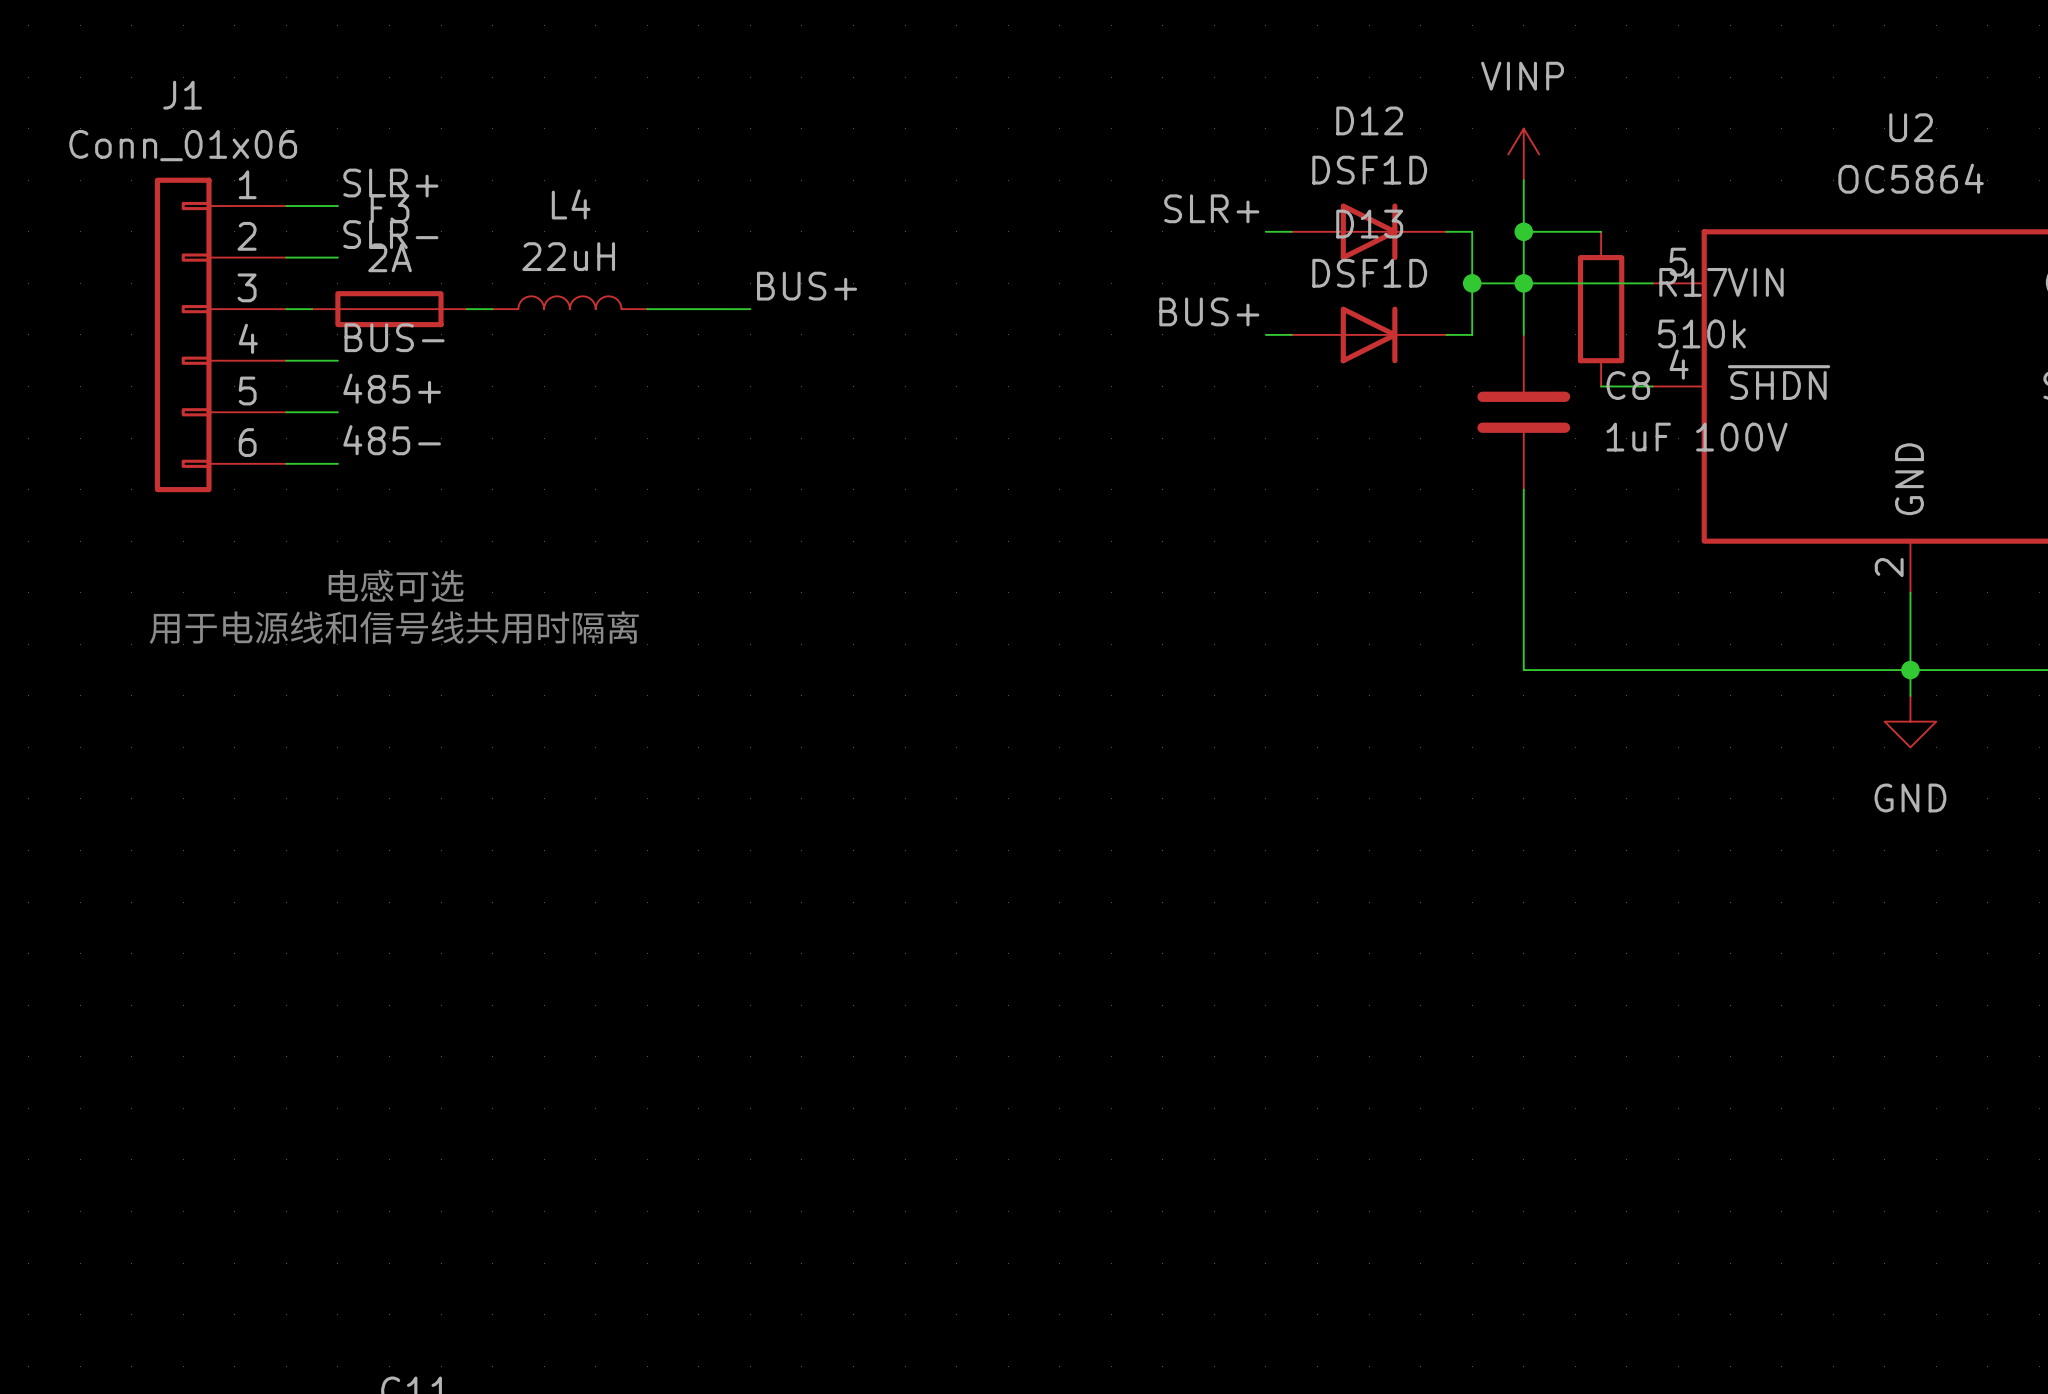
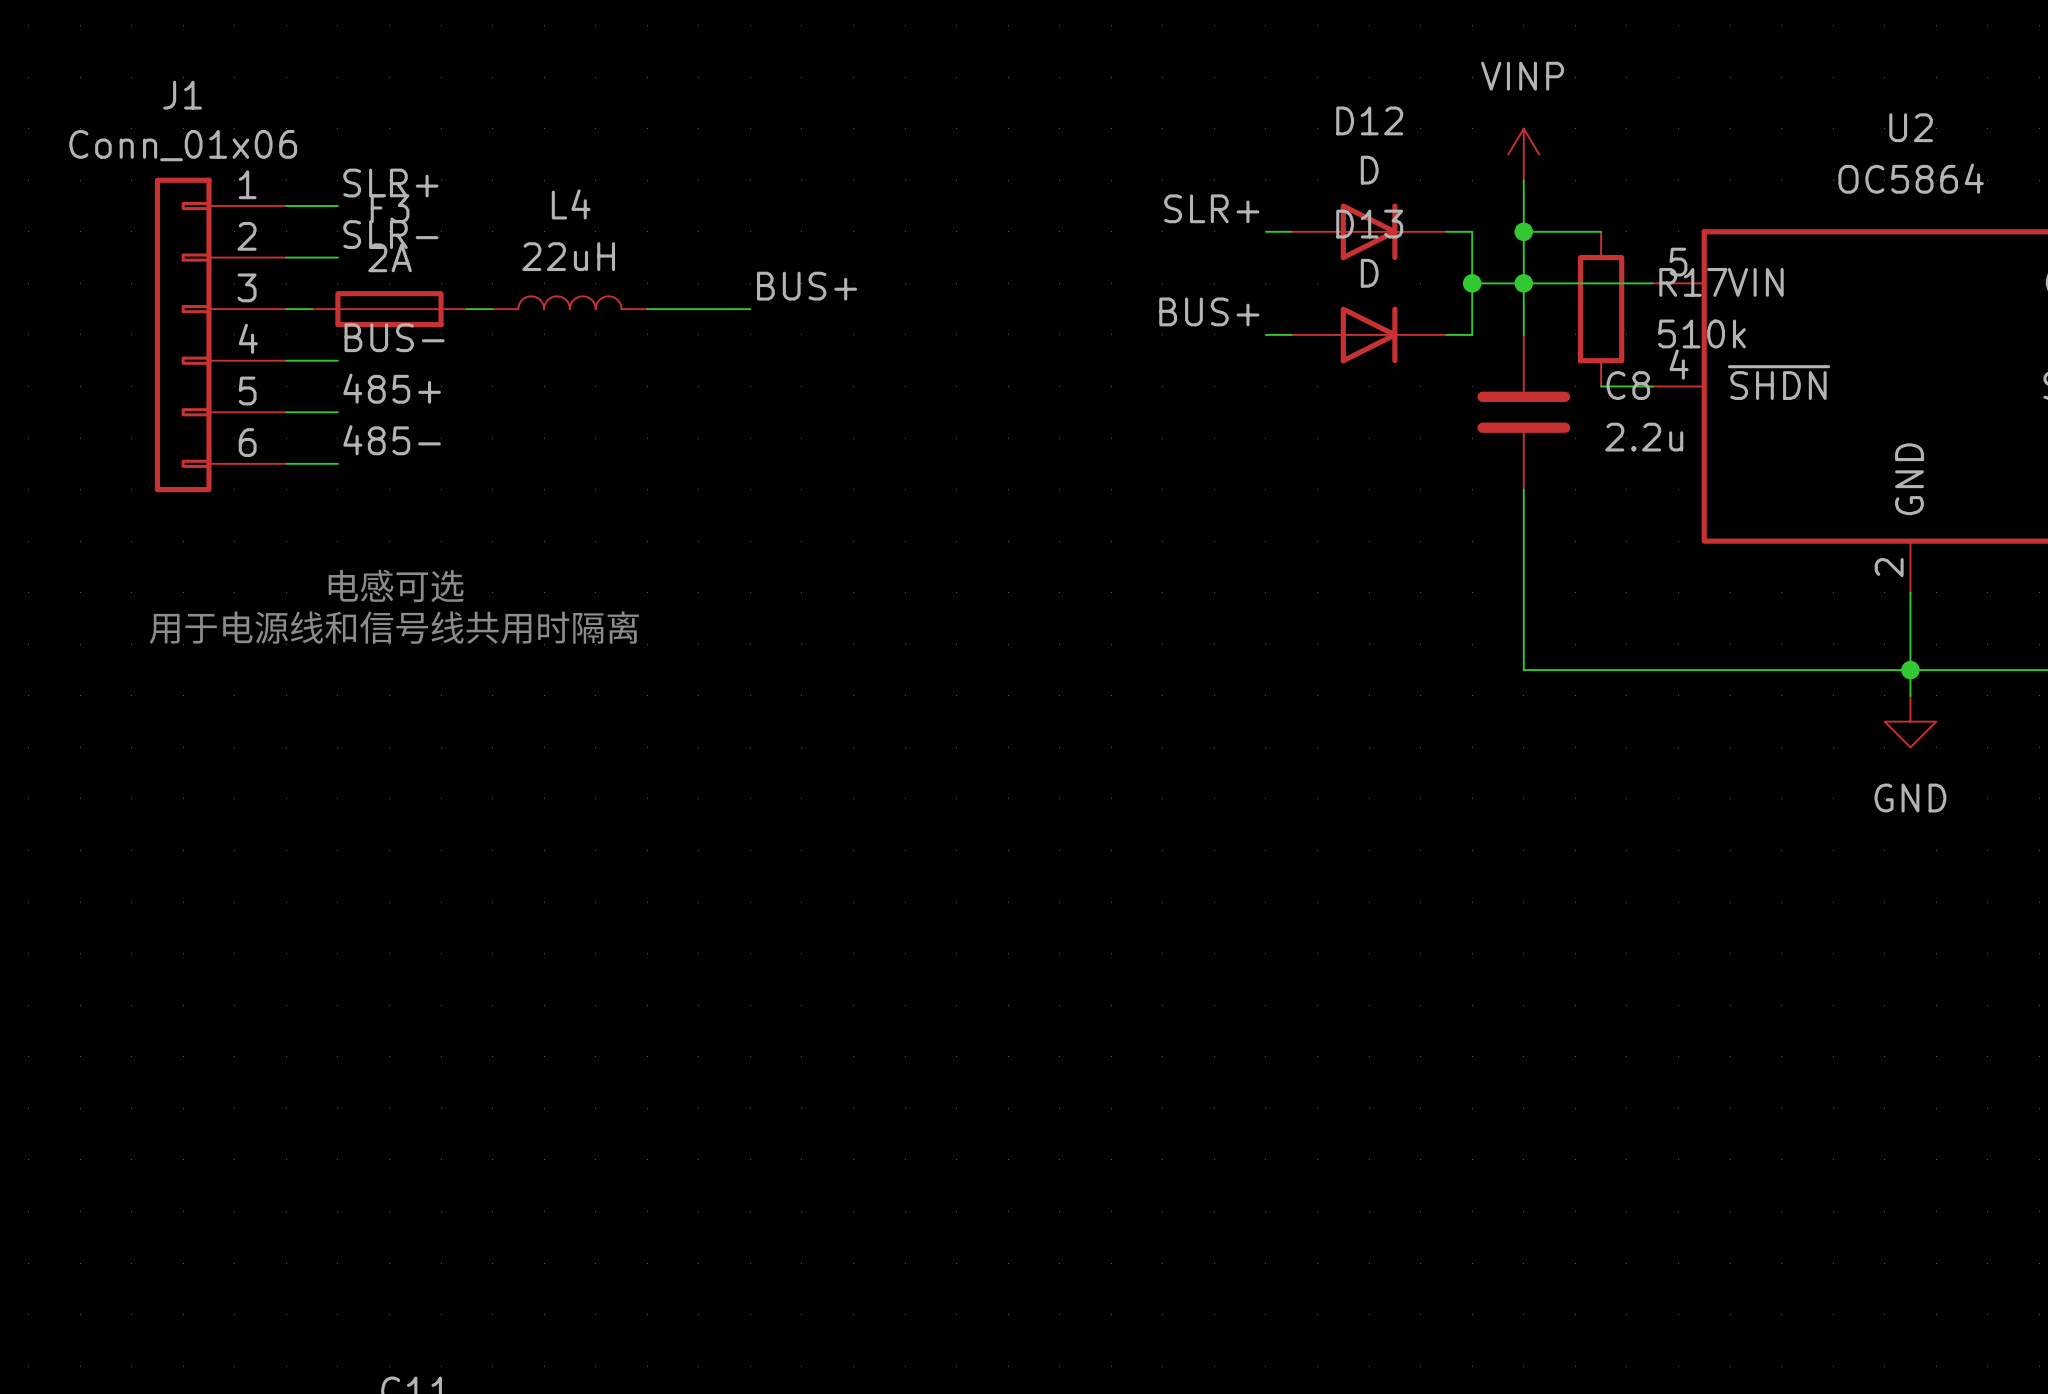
D12 value: DSF1D (1369, 170) -> D (1369, 170)
D13 value: DSF1D (1369, 273) -> D (1369, 273)
C8 value: 1uF 100V (1697, 437) -> 2.2u (1644, 437)

